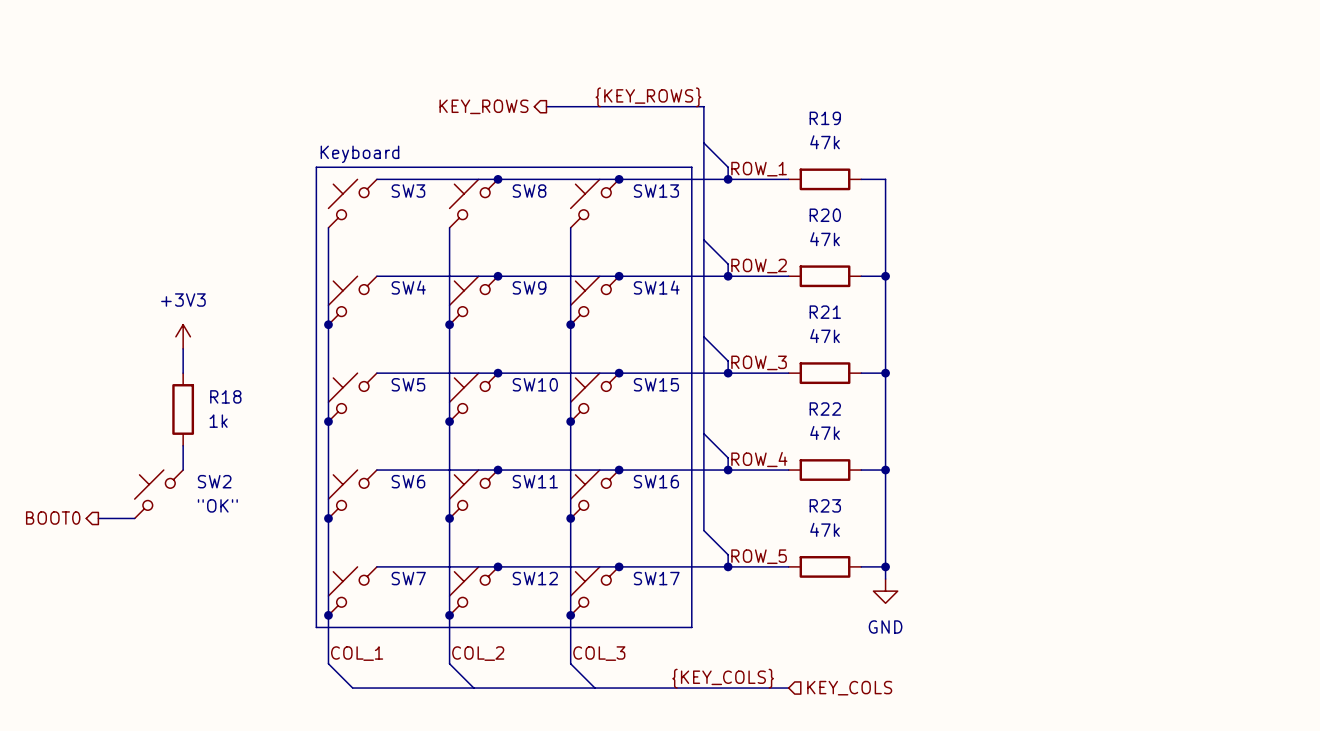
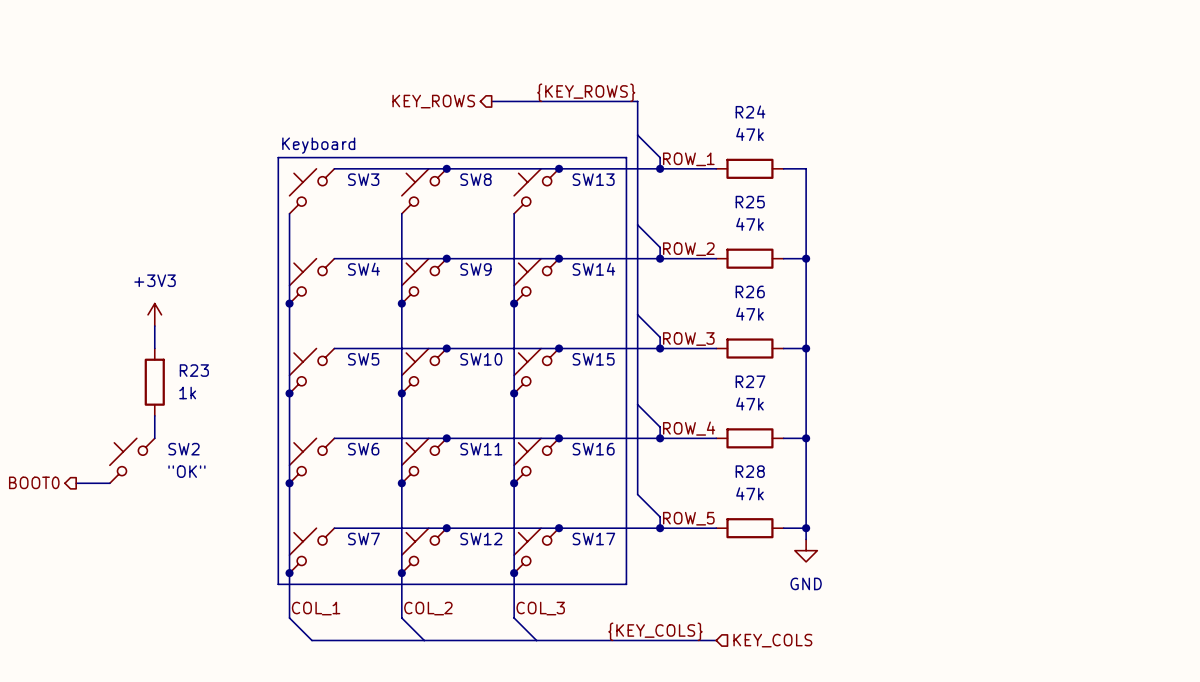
R19 name: R19 (825, 118) -> R24 (750, 112)
R20 name: R20 (825, 215) -> R25 (750, 202)
R21 name: R21 (825, 312) -> R26 (750, 291)
R18 name: R18 (225, 396) -> R23 (194, 370)
R22 name: R22 (825, 409) -> R27 (750, 381)
R23 name: R23 (825, 505) -> R28 (750, 471)

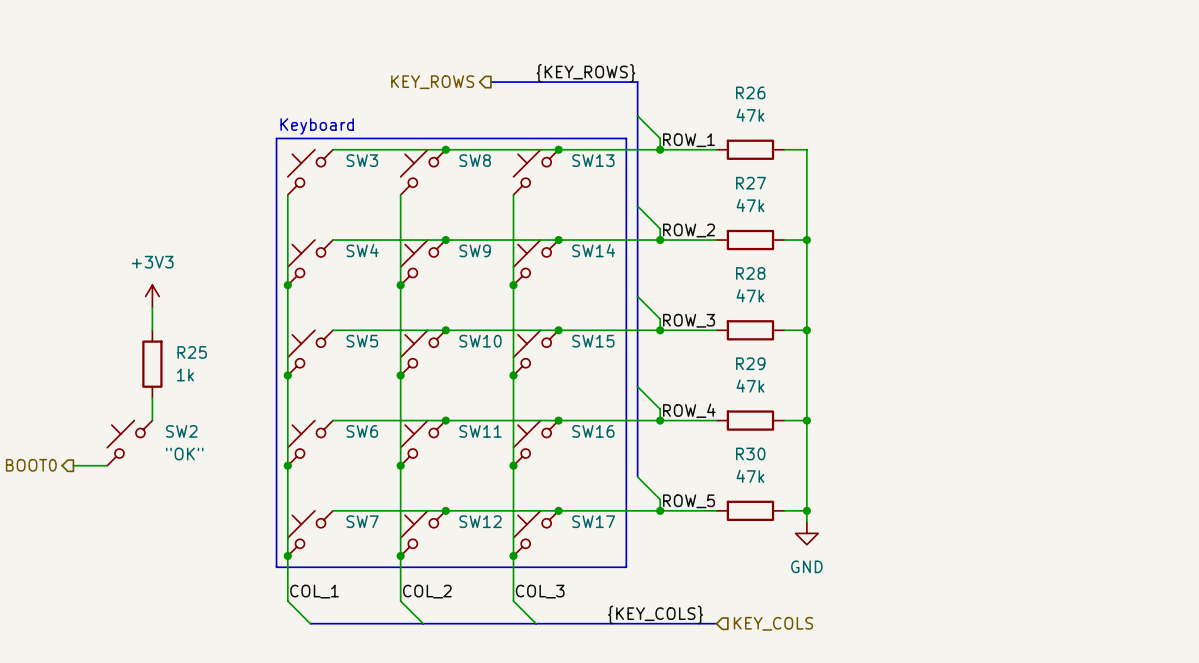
R24 name: R24 (750, 112) -> R26 (750, 92)
R25 name: R25 (750, 202) -> R27 (751, 183)
R26 name: R26 (750, 291) -> R28 (750, 273)
R23 name: R23 (194, 370) -> R25 (192, 352)
R27 name: R27 (750, 381) -> R29 (750, 363)
R28 name: R28 (750, 471) -> R30 (750, 454)

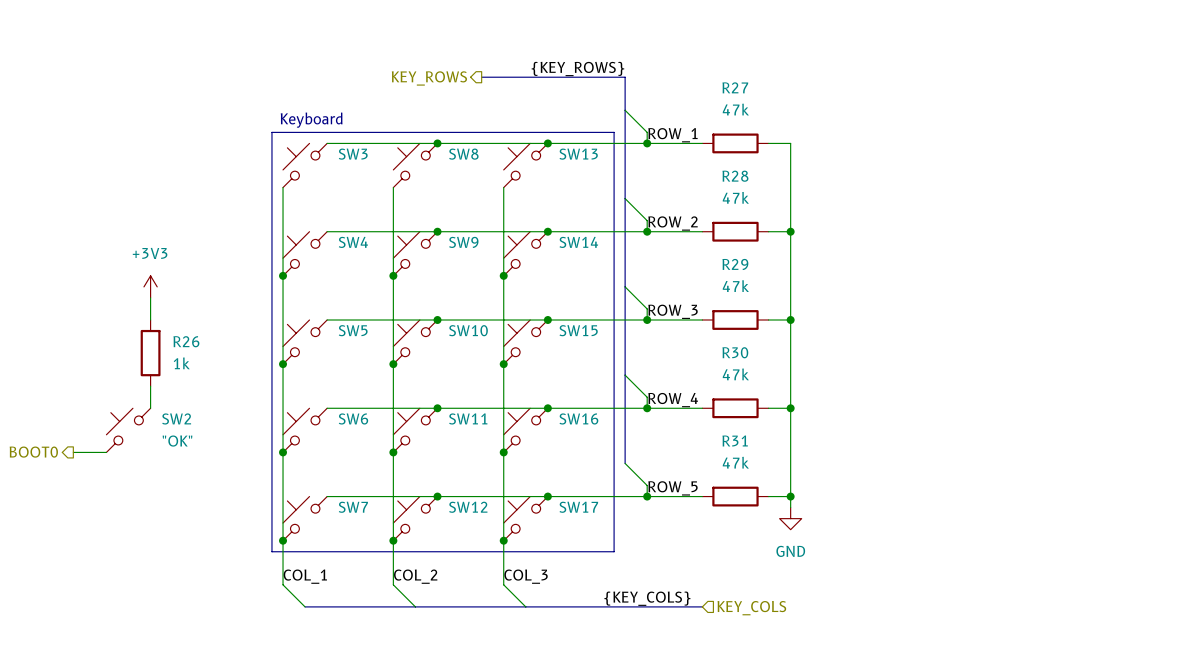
R26 name: R26 (750, 92) -> R27 (735, 87)
R27 name: R27 (751, 183) -> R28 (735, 176)
R28 name: R28 (750, 273) -> R29 (735, 264)
R25 name: R25 (192, 352) -> R26 (186, 341)
R29 name: R29 (750, 363) -> R30 (735, 352)
R30 name: R30 (750, 454) -> R31 (735, 440)

